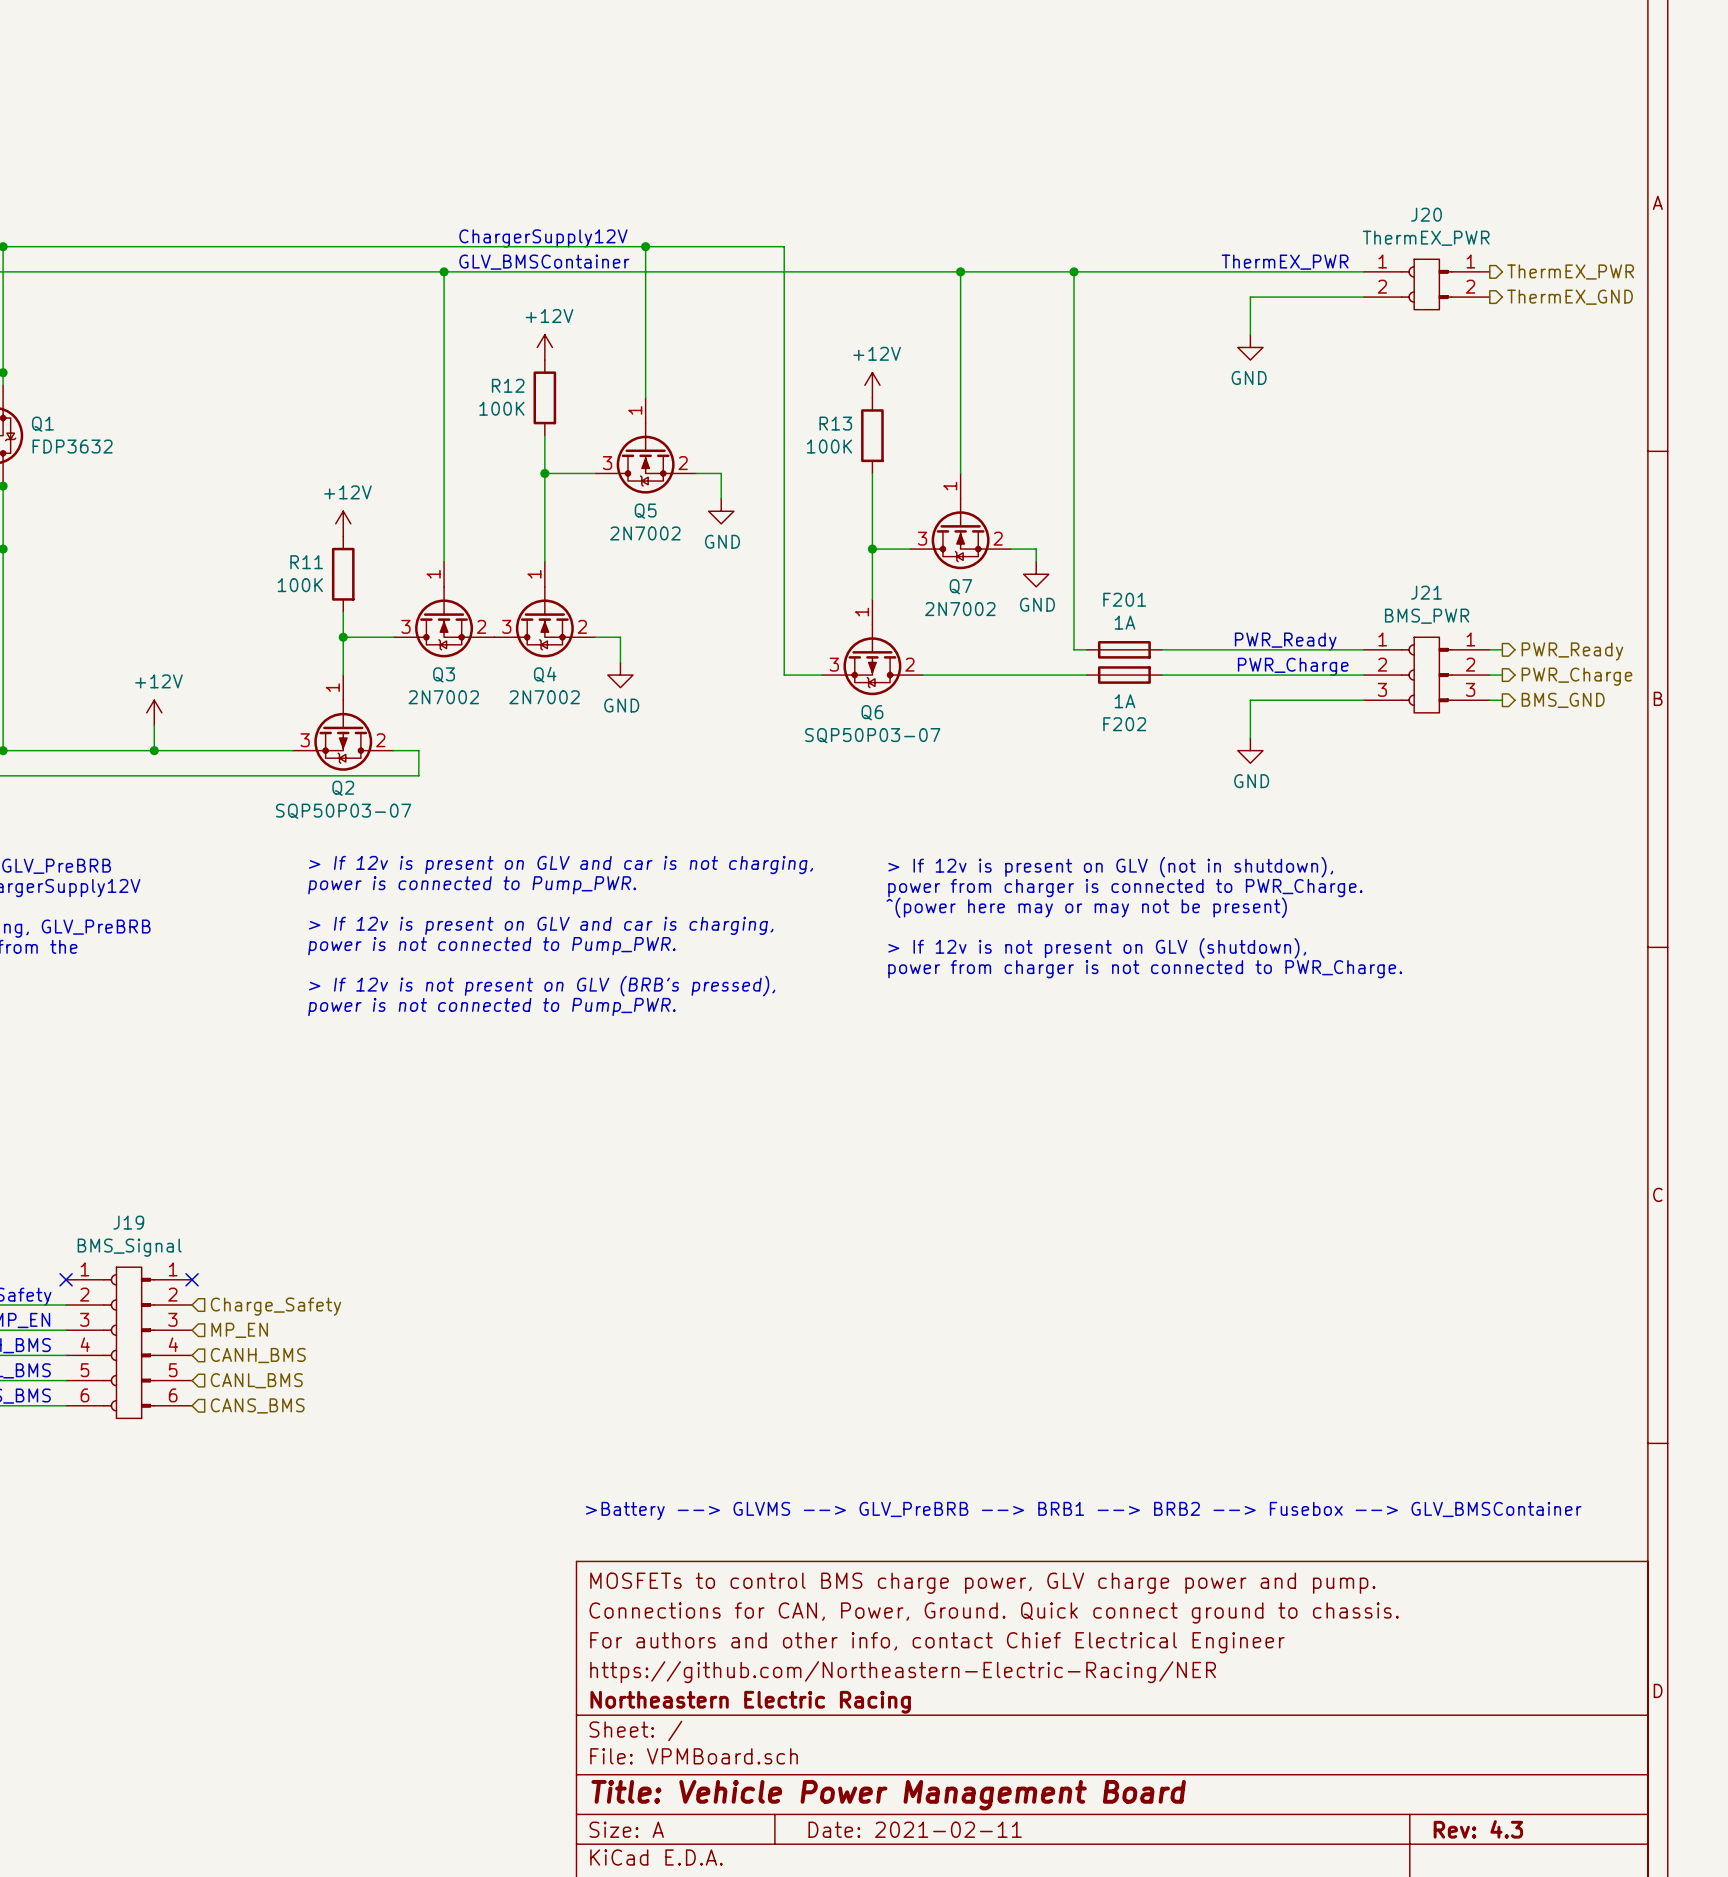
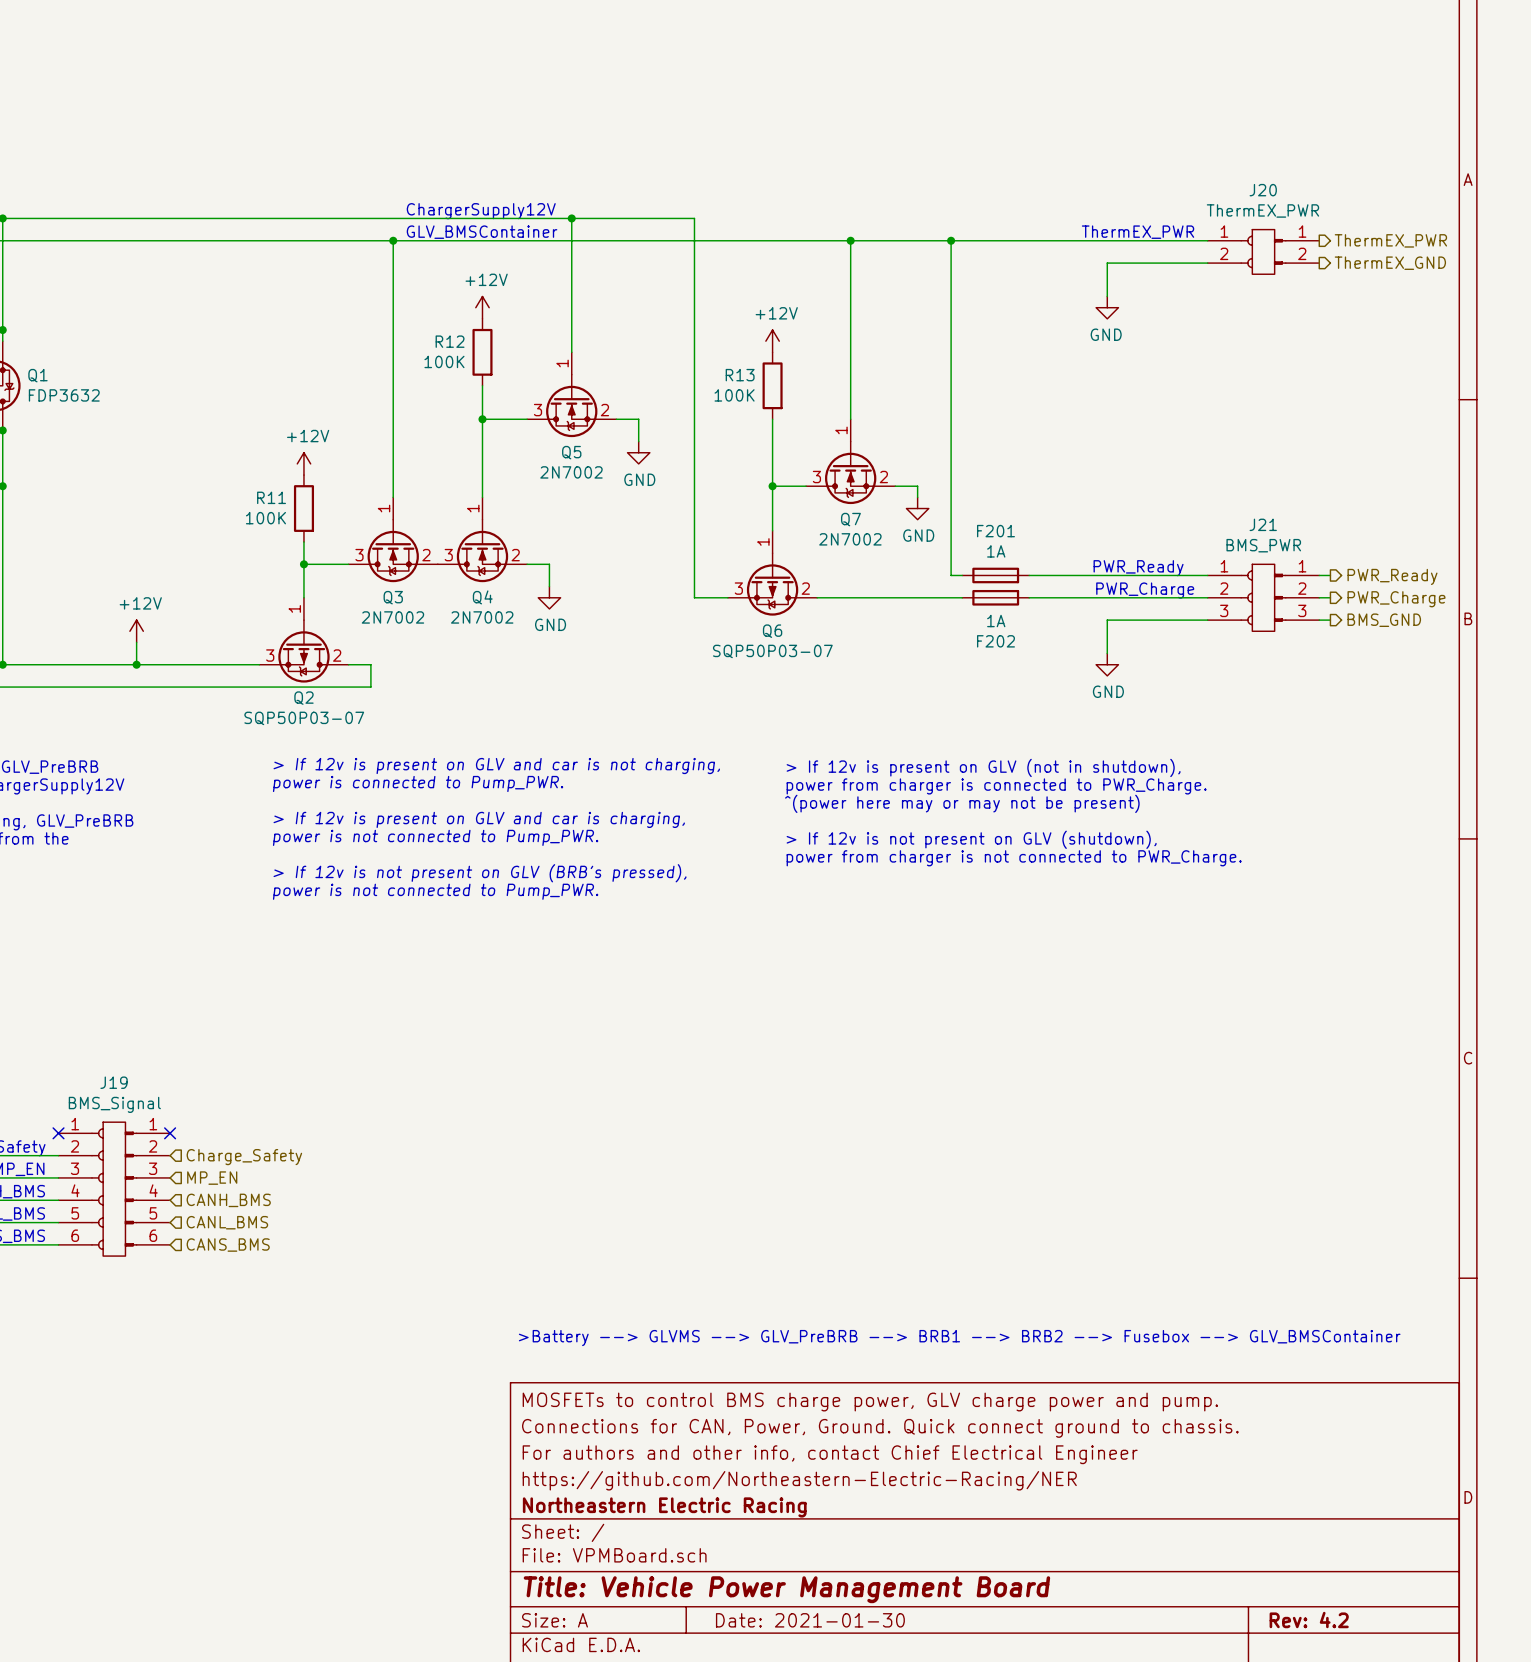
title block: Date: 2021-02-11 (915, 1829) -> Date: 2021-01-30 (810, 1620)
title block: Rev: 4.3 (1478, 1829) -> Rev: 4.2 (1309, 1620)

